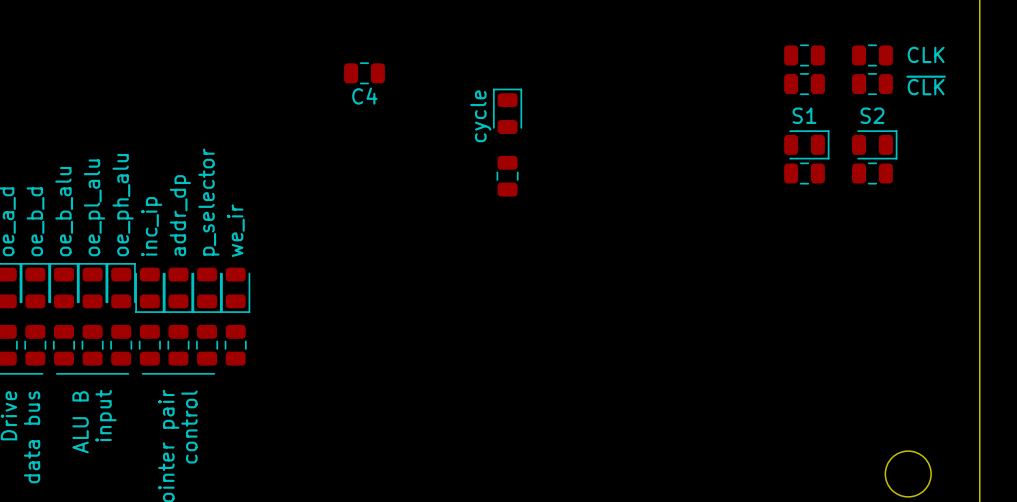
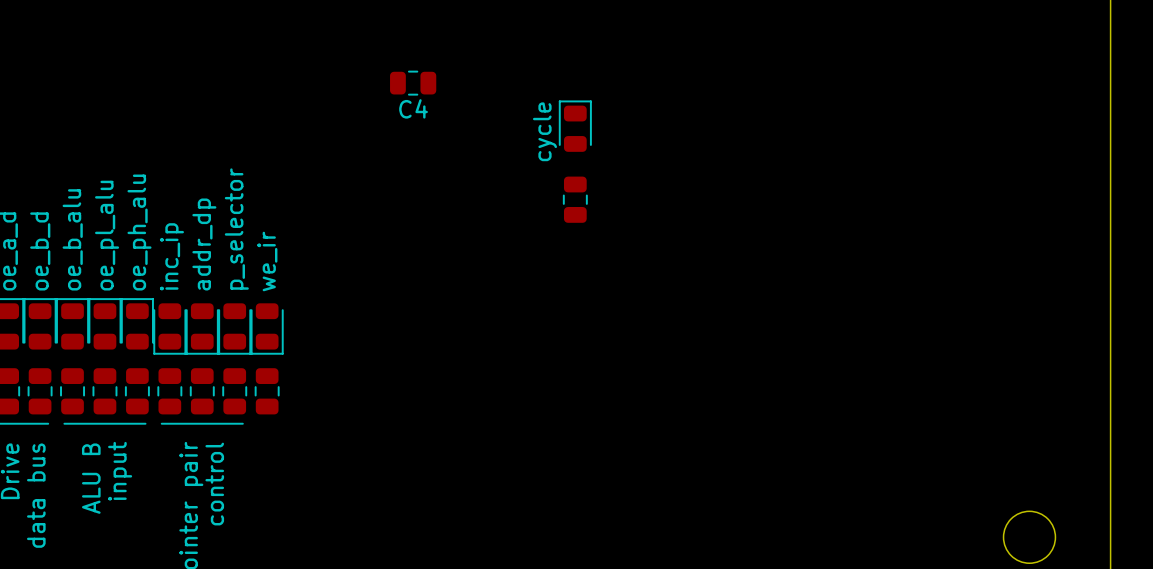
text: CLK (926, 54) -> none
part: (804, 55) -> none
part: (872, 55) -> none
part: (804, 84) -> none
part: (872, 84) -> none
text: ~{CLK} (926, 85) -> none
text: S1 (804, 115) -> none
text: S2 (872, 115) -> none
part: (806, 144) -> none
part: (874, 144) -> none
part: (804, 173) -> none
part: (872, 173) -> none

